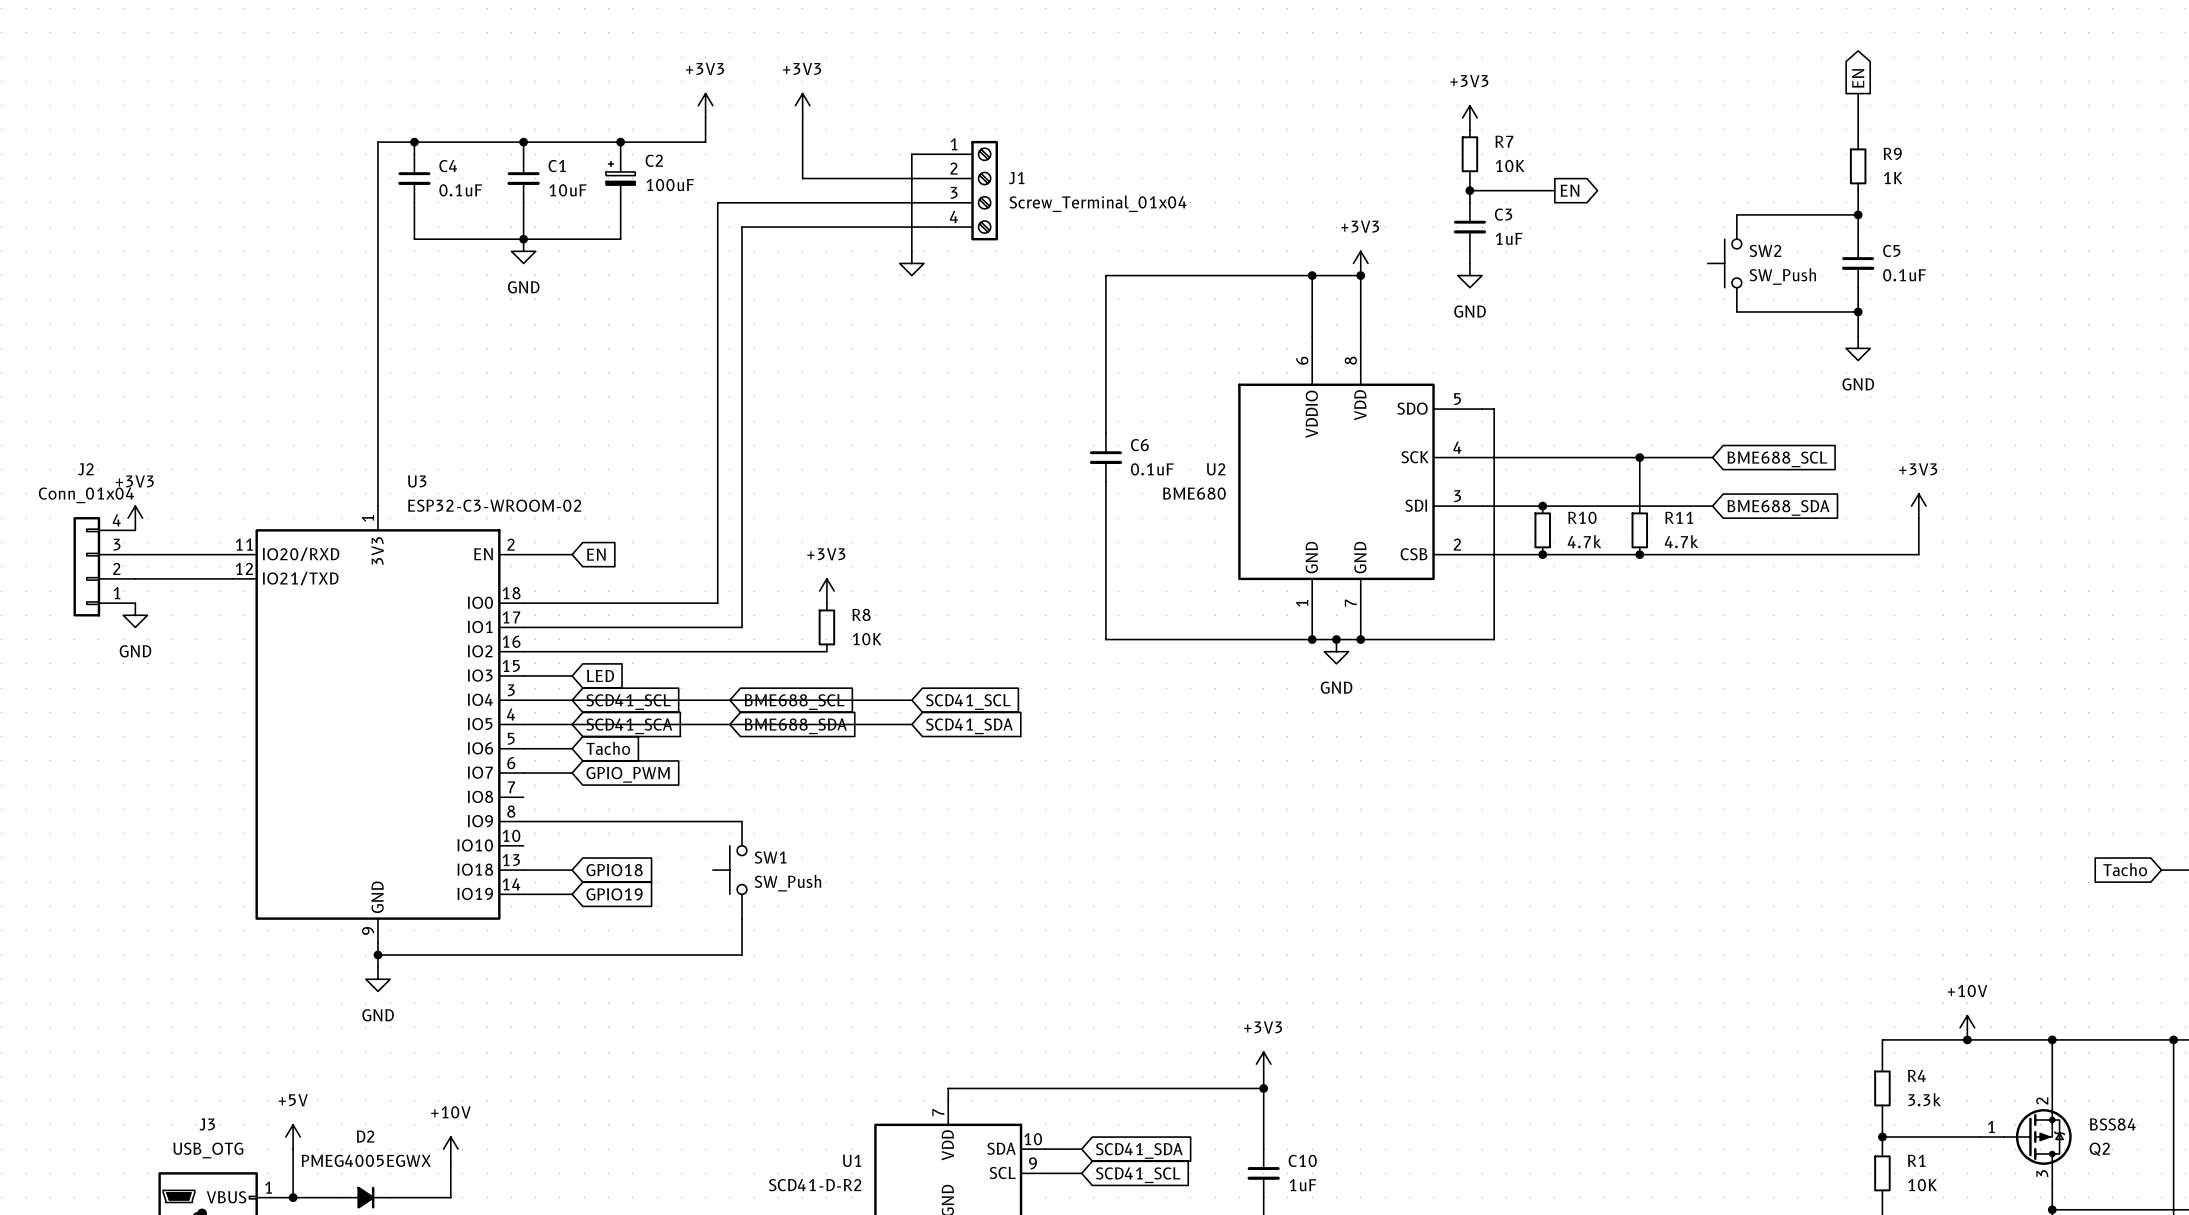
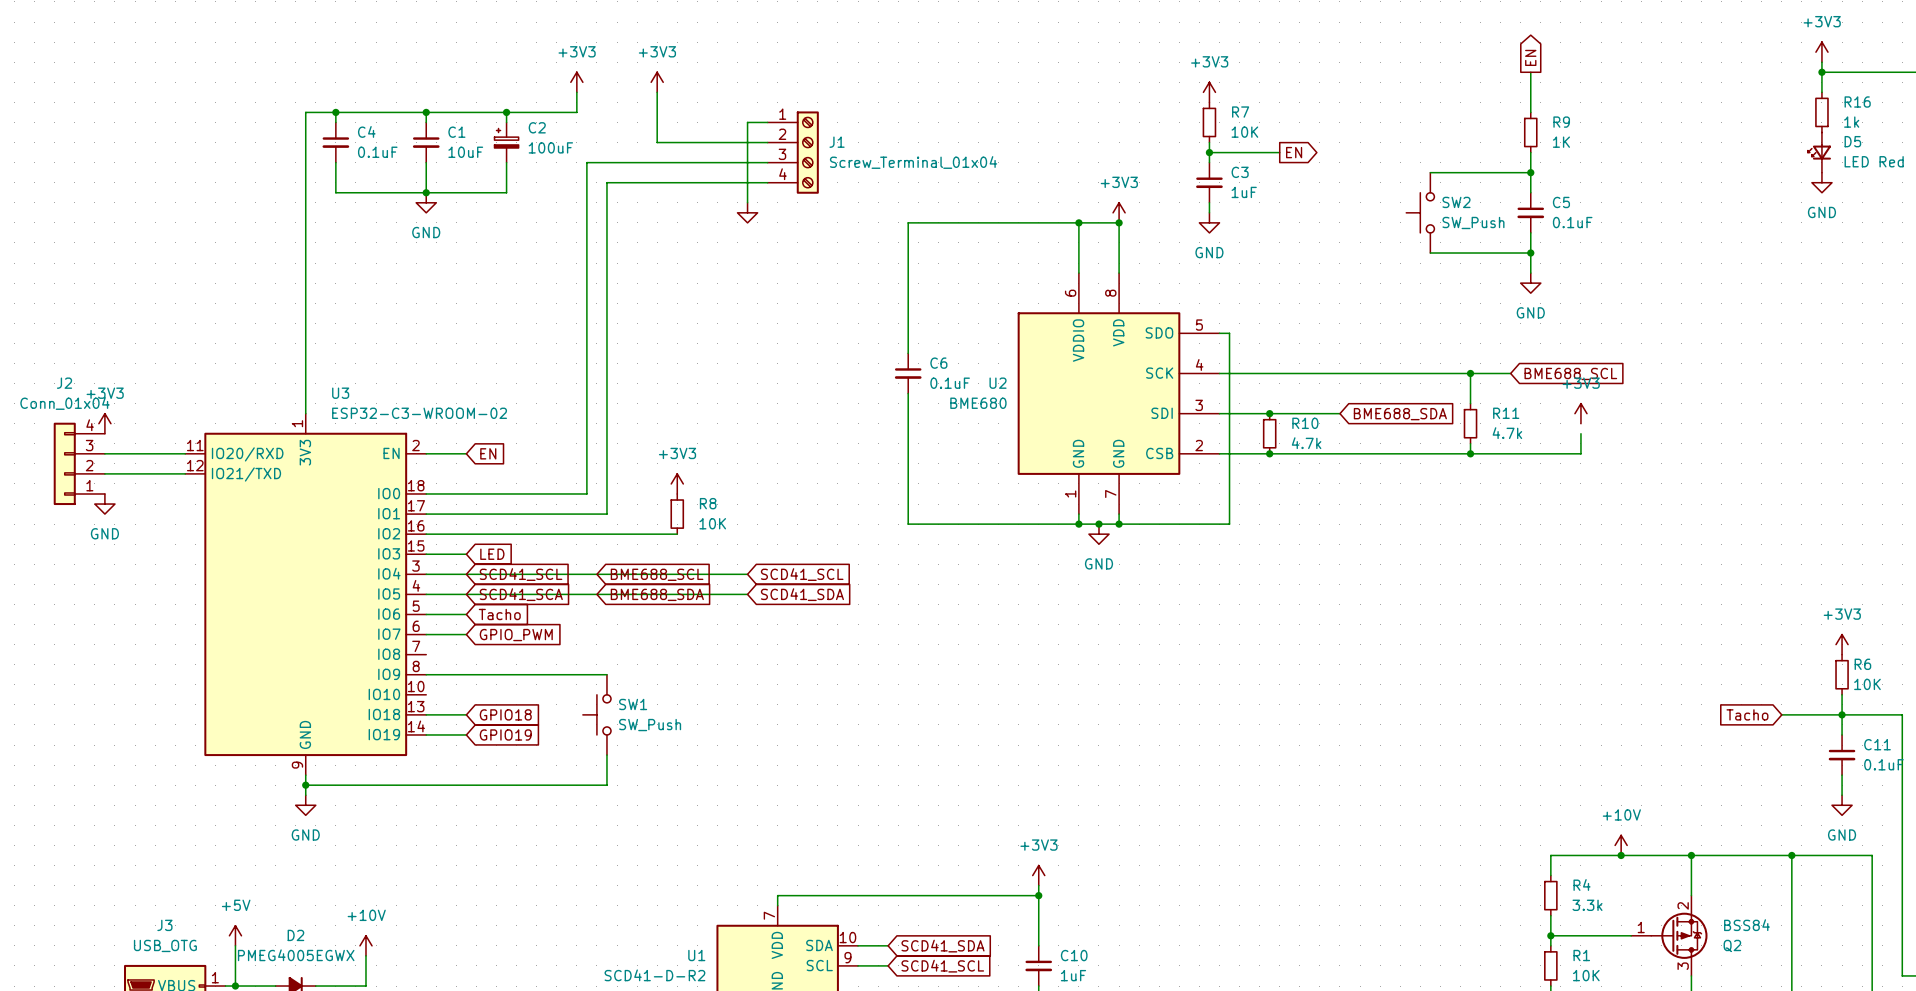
wire: (1639, 457) (1639, 506) -> none
junction: (1639, 457) -> none
wire: none -> (1410, 373) (1510, 373)
wire: none -> (1470, 373) (1470, 403)
junction: none -> (1470, 373)
global label position: BME688_SCL (1777, 459) -> BME688_SCL (1570, 373)
wire: (1627, 506) (1712, 506) -> none
global label position: BME688_SDA (1778, 507) -> BME688_SDA (1400, 414)
wire: (1918, 518) (1918, 530) -> (1470, 443) (1470, 453)
R11 position: (1639, 530) -> (1470, 423)
junction: (1639, 554) -> none
junction: none -> (1470, 453)

